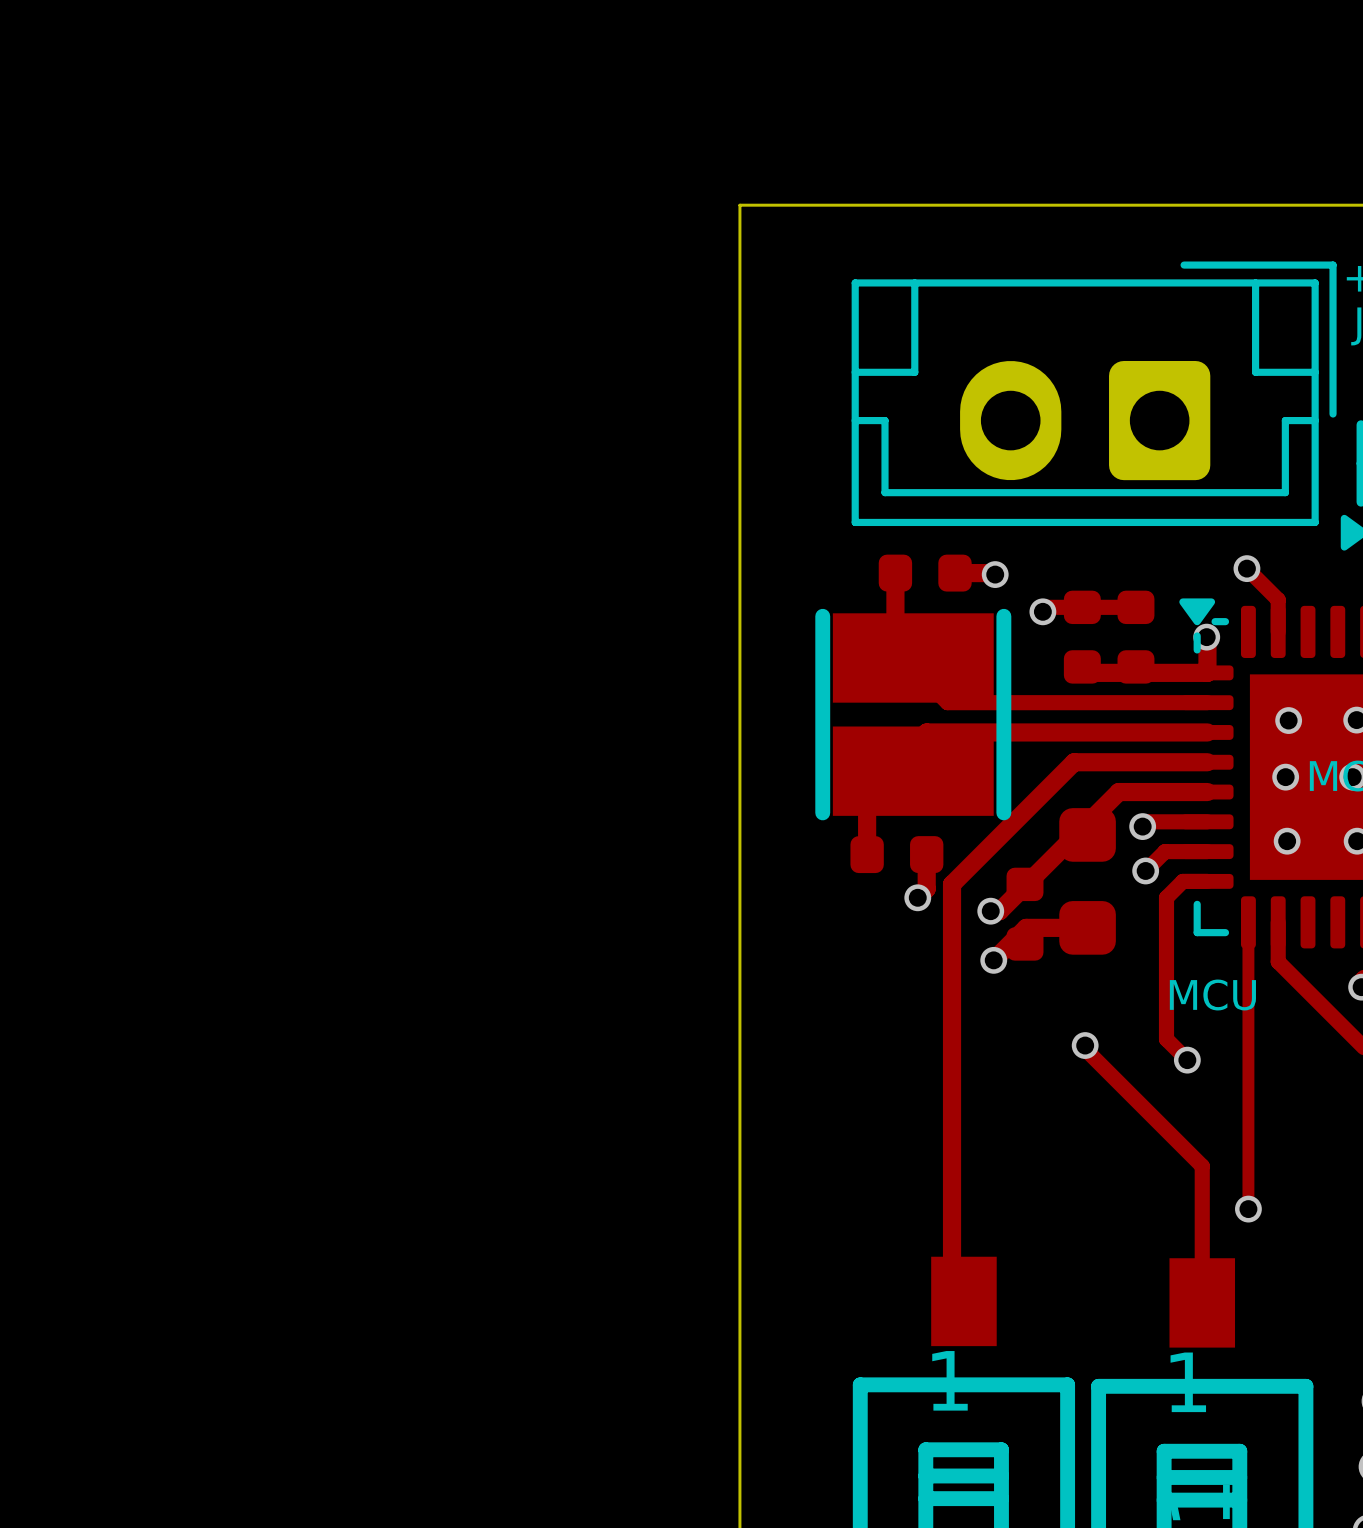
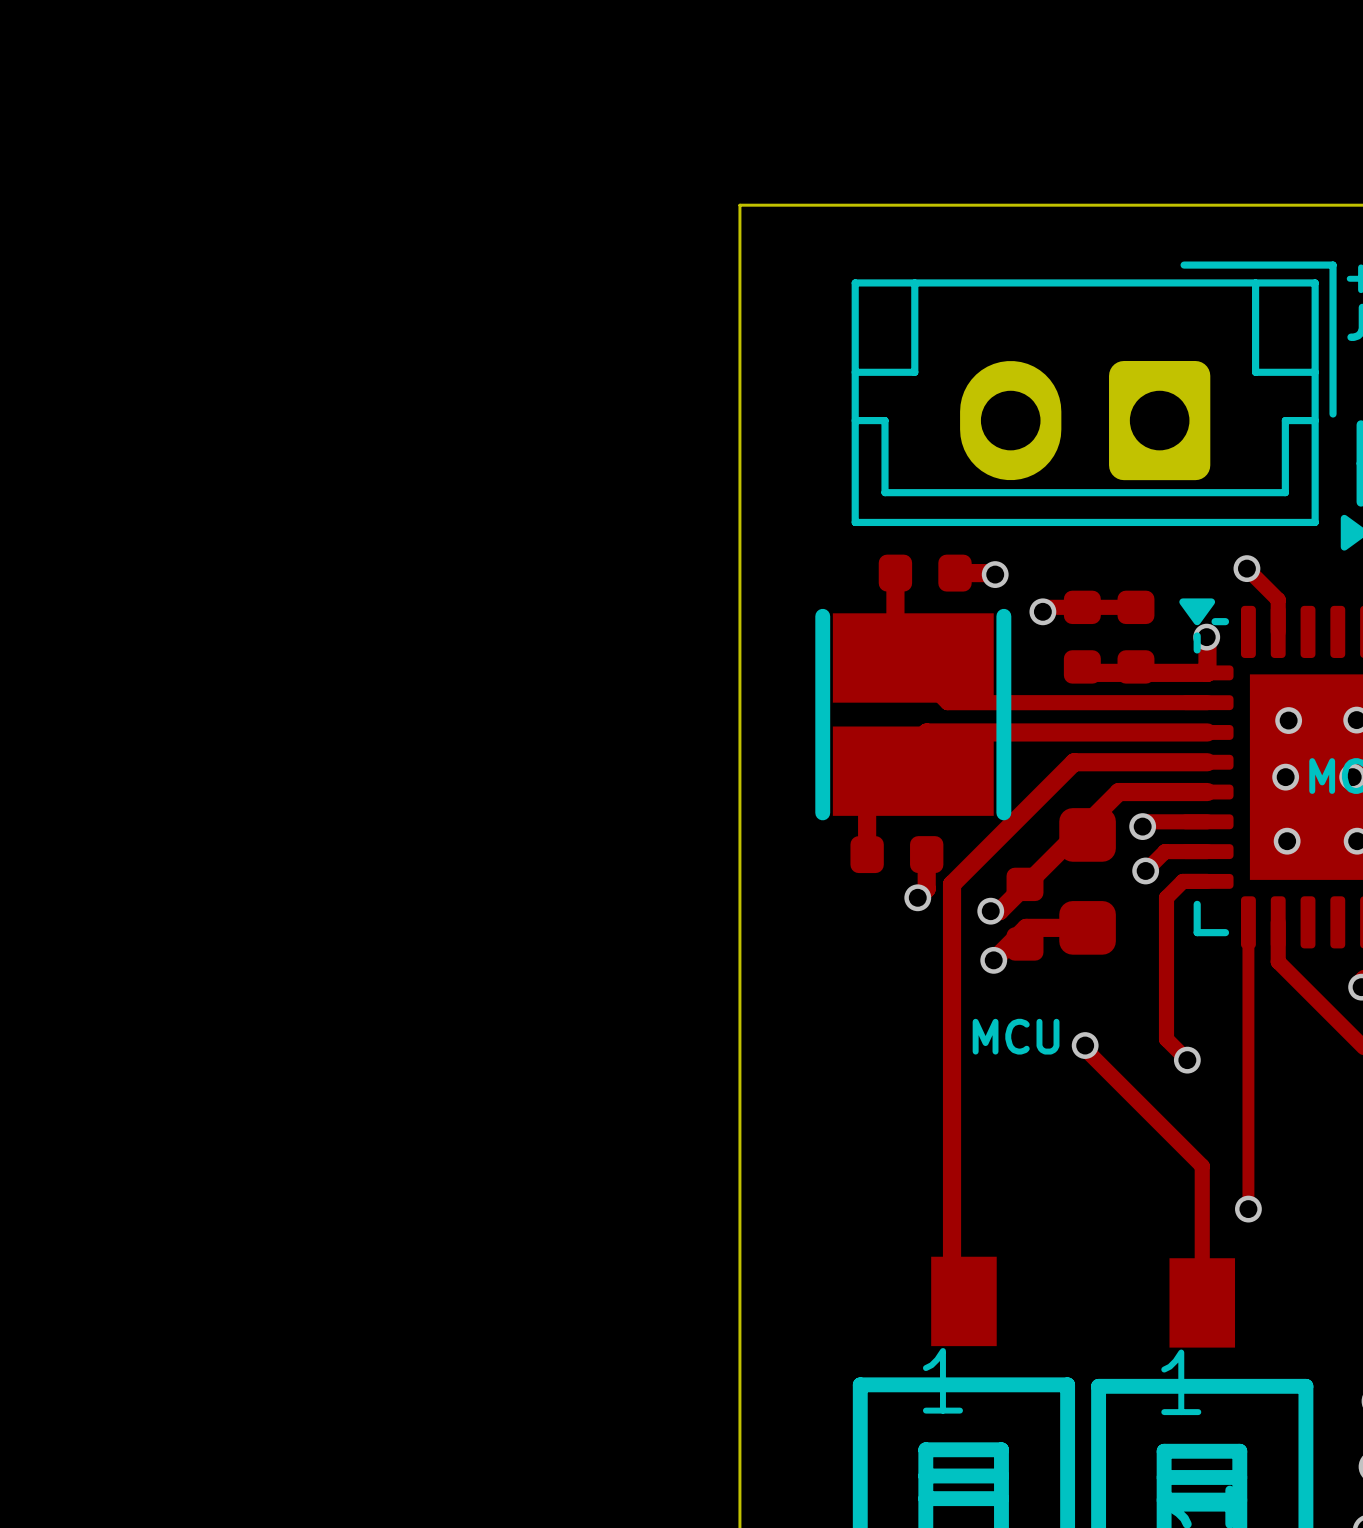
text position: MCU (1212, 995) -> MCU (1016, 1036)

